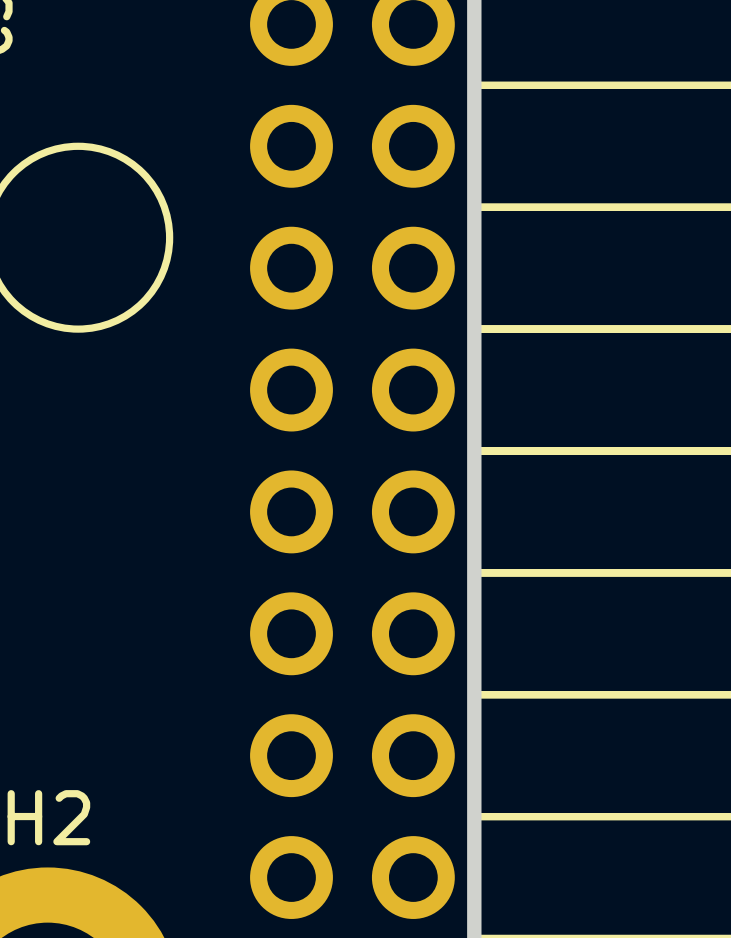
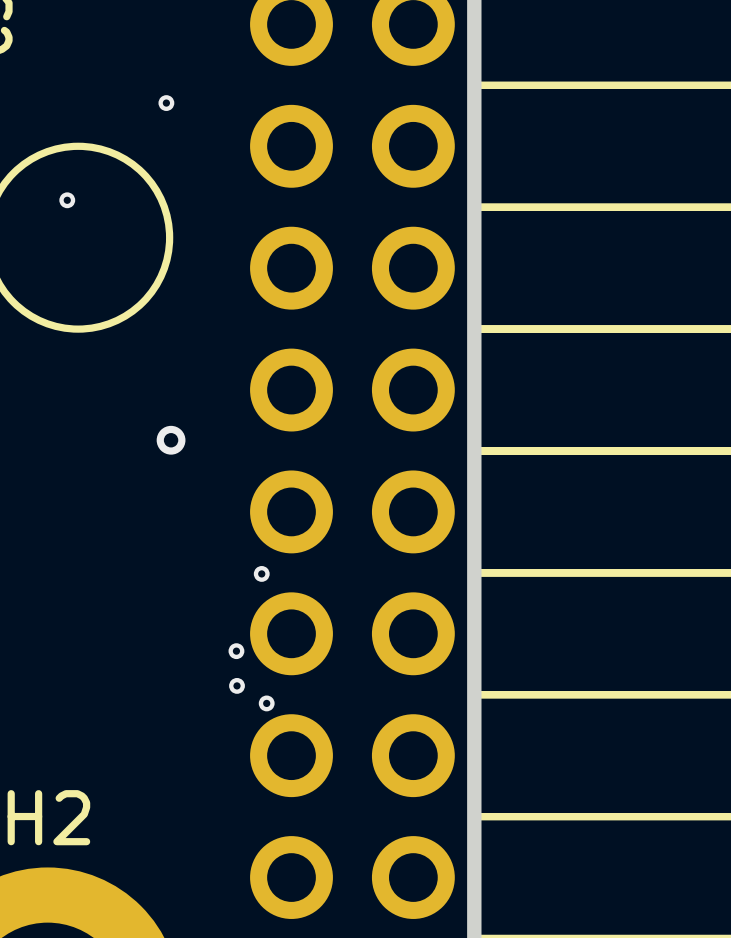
via: none -> (166, 103)
via: none -> (67, 200)
via: none -> (171, 440)
via: none -> (261, 573)
via: none -> (236, 651)
via: none -> (237, 685)
via: none -> (266, 703)

